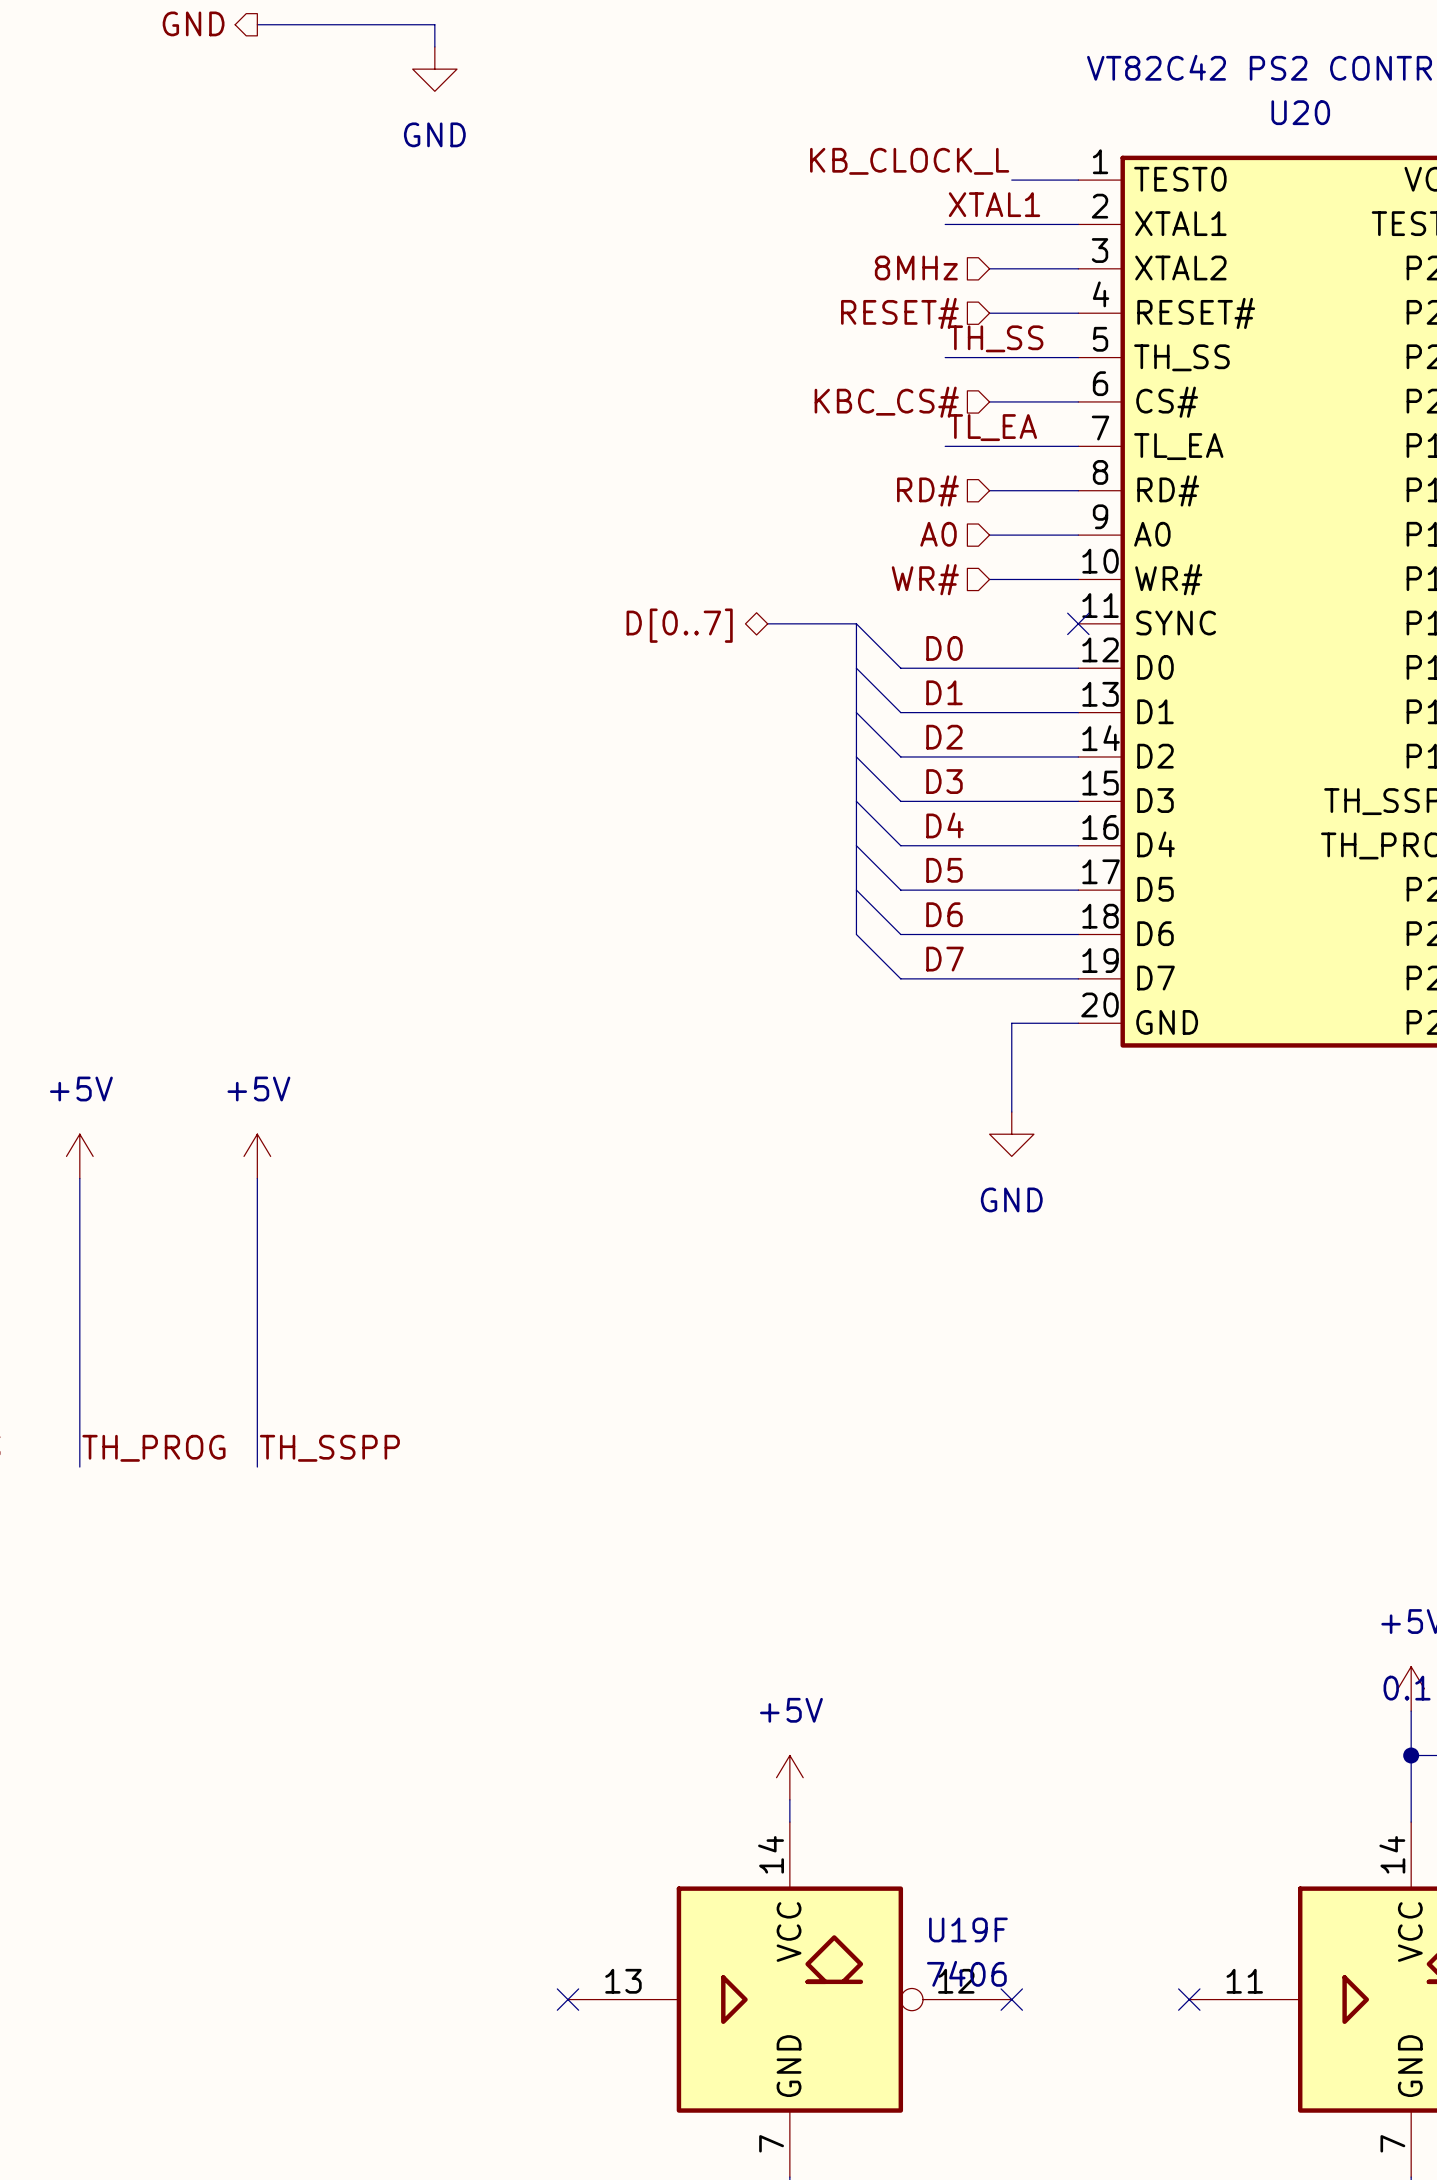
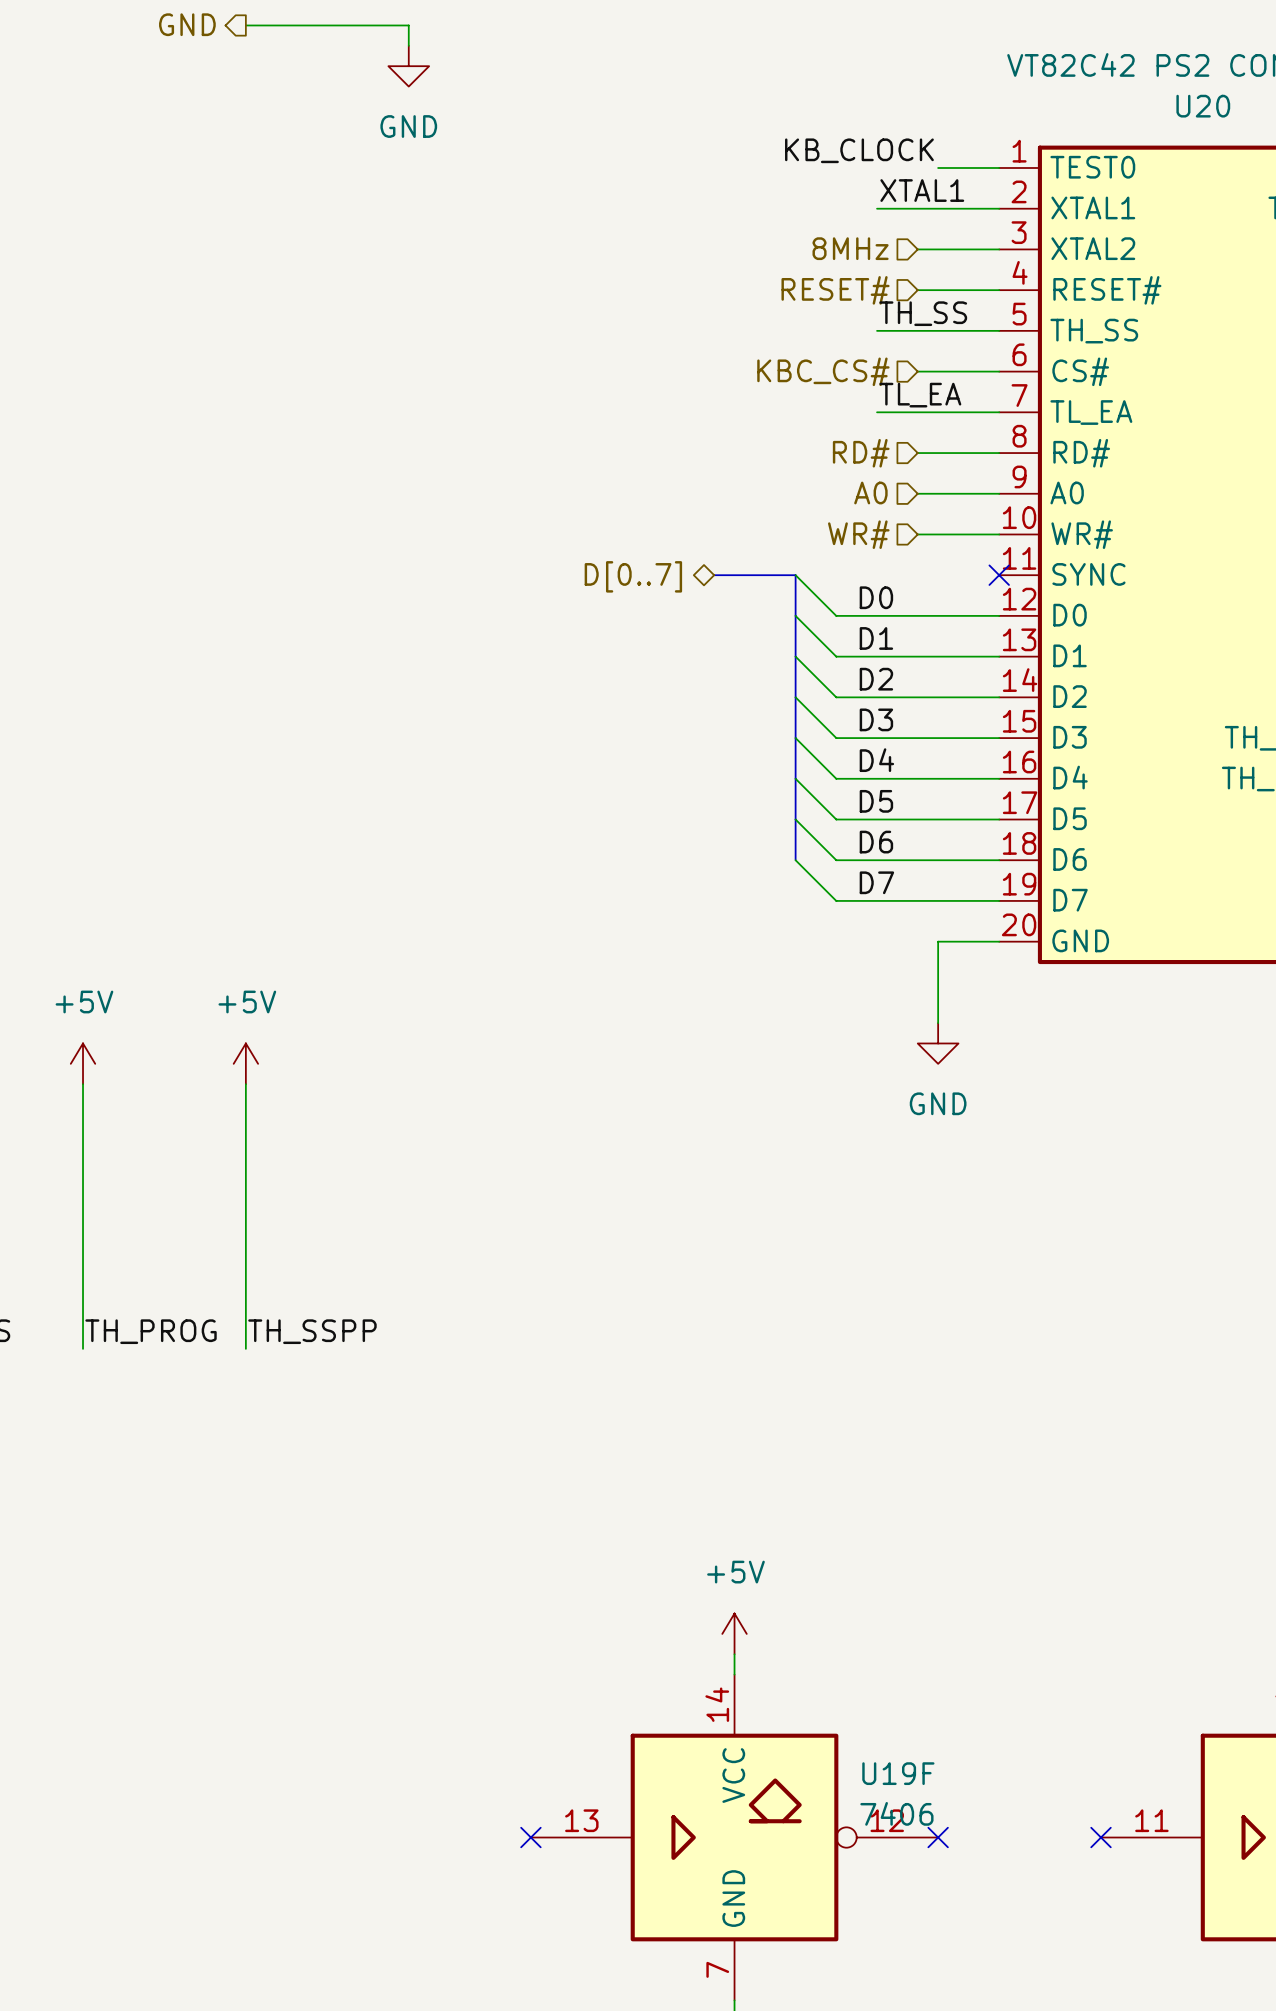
label: KB_CLOCK_L (909, 161) -> KB_CLOCK (859, 150)

